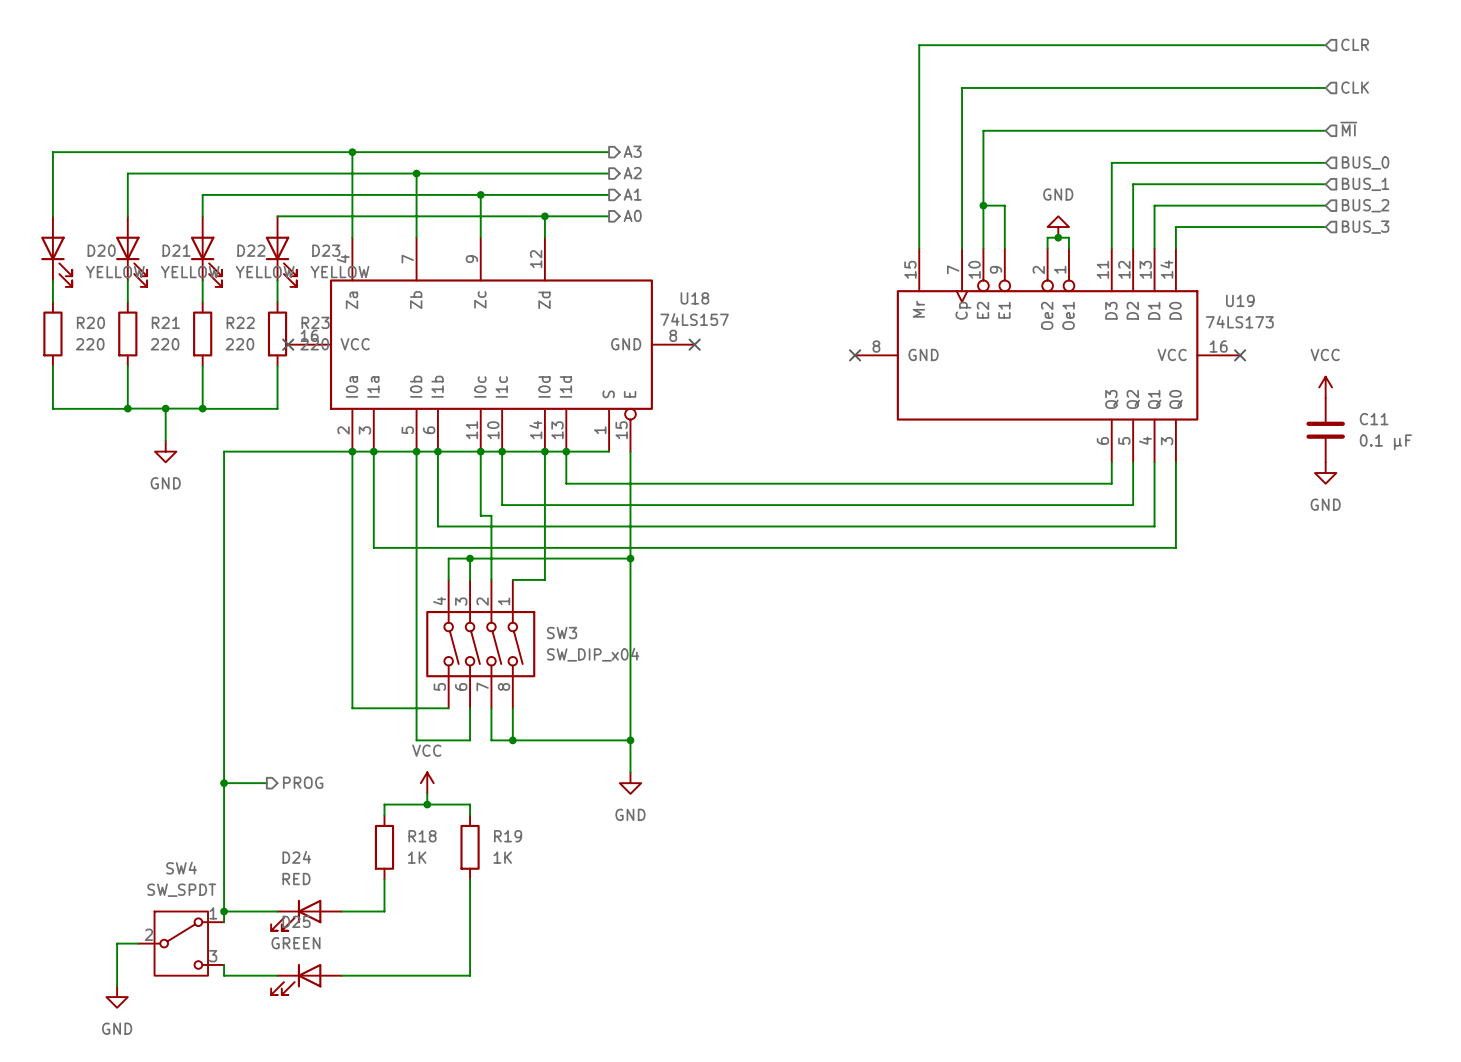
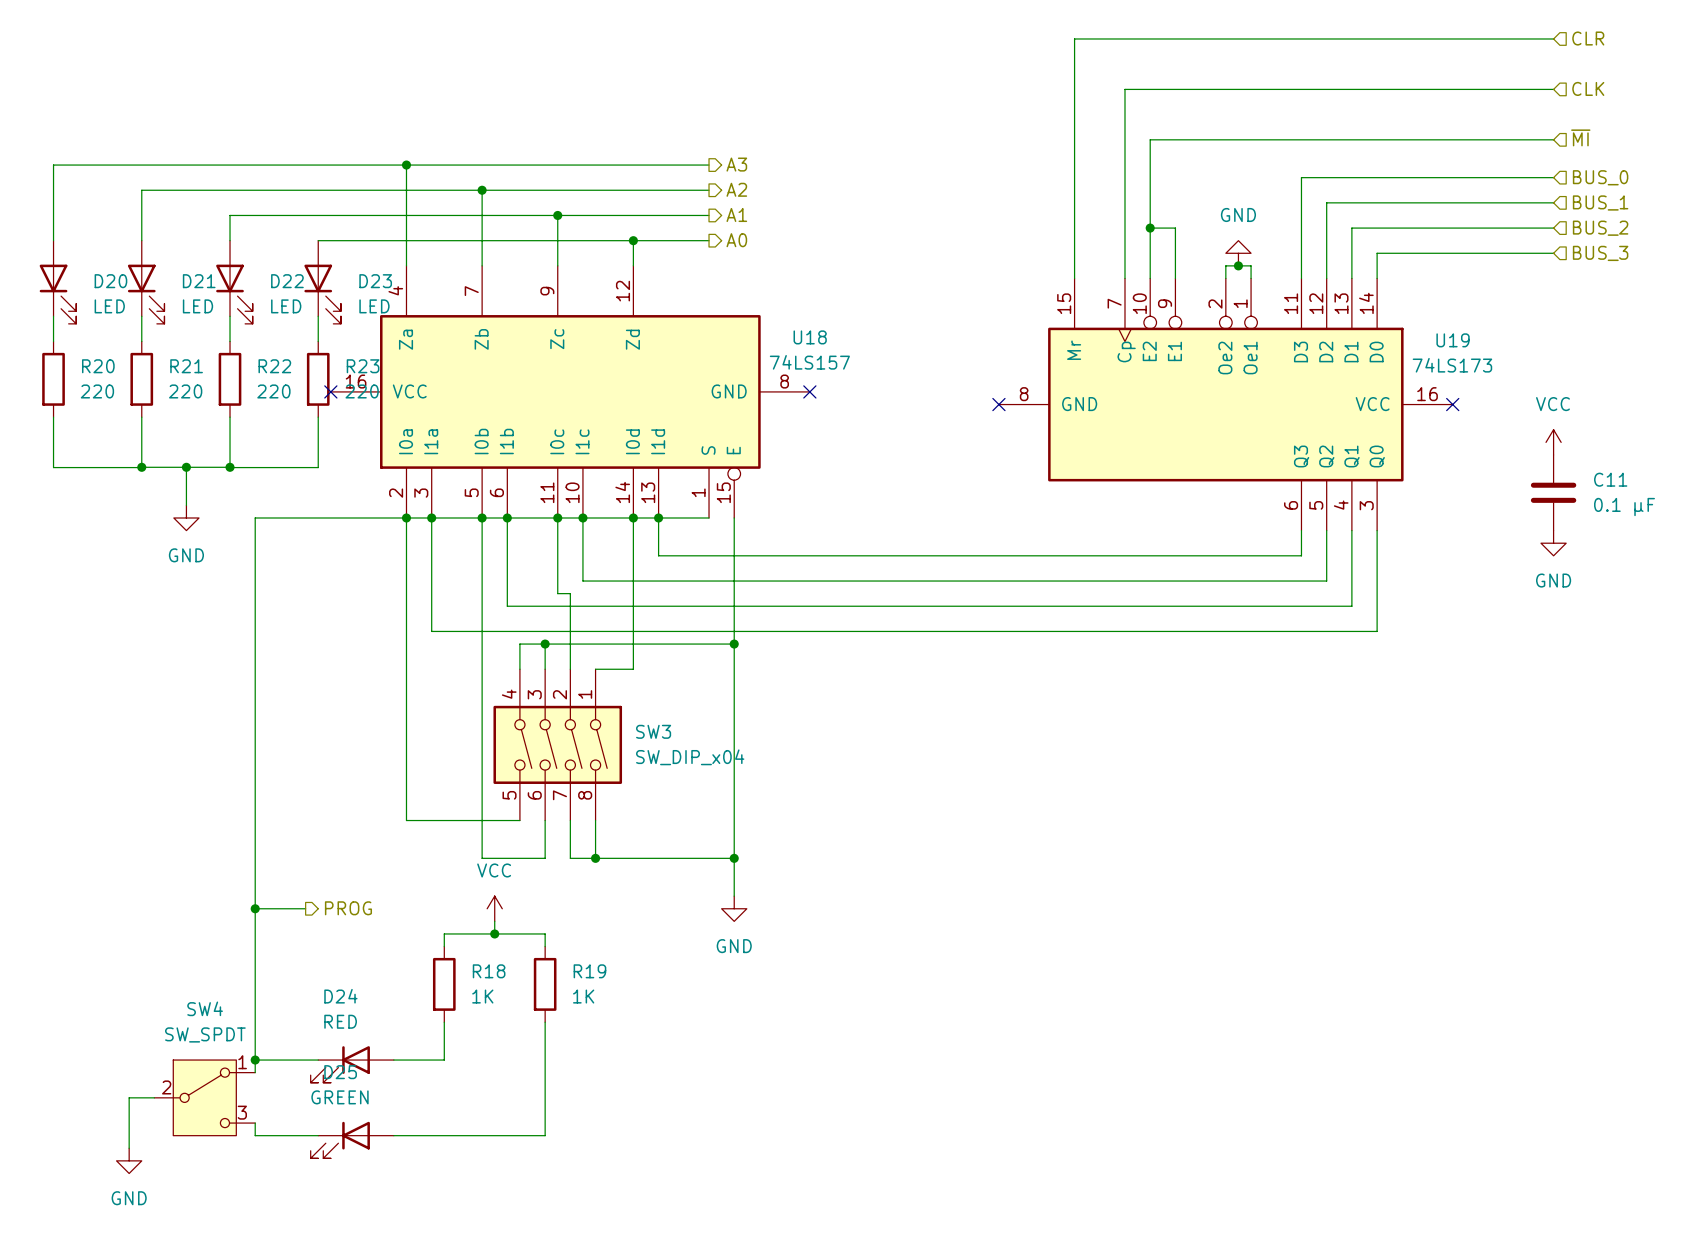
D20 value: YELLOW (115, 272) -> LED (109, 306)
D21 value: YELLOW (190, 272) -> LED (197, 306)
D22 value: YELLOW (265, 272) -> LED (286, 306)
D23 value: YELLOW (340, 272) -> LED (374, 306)

